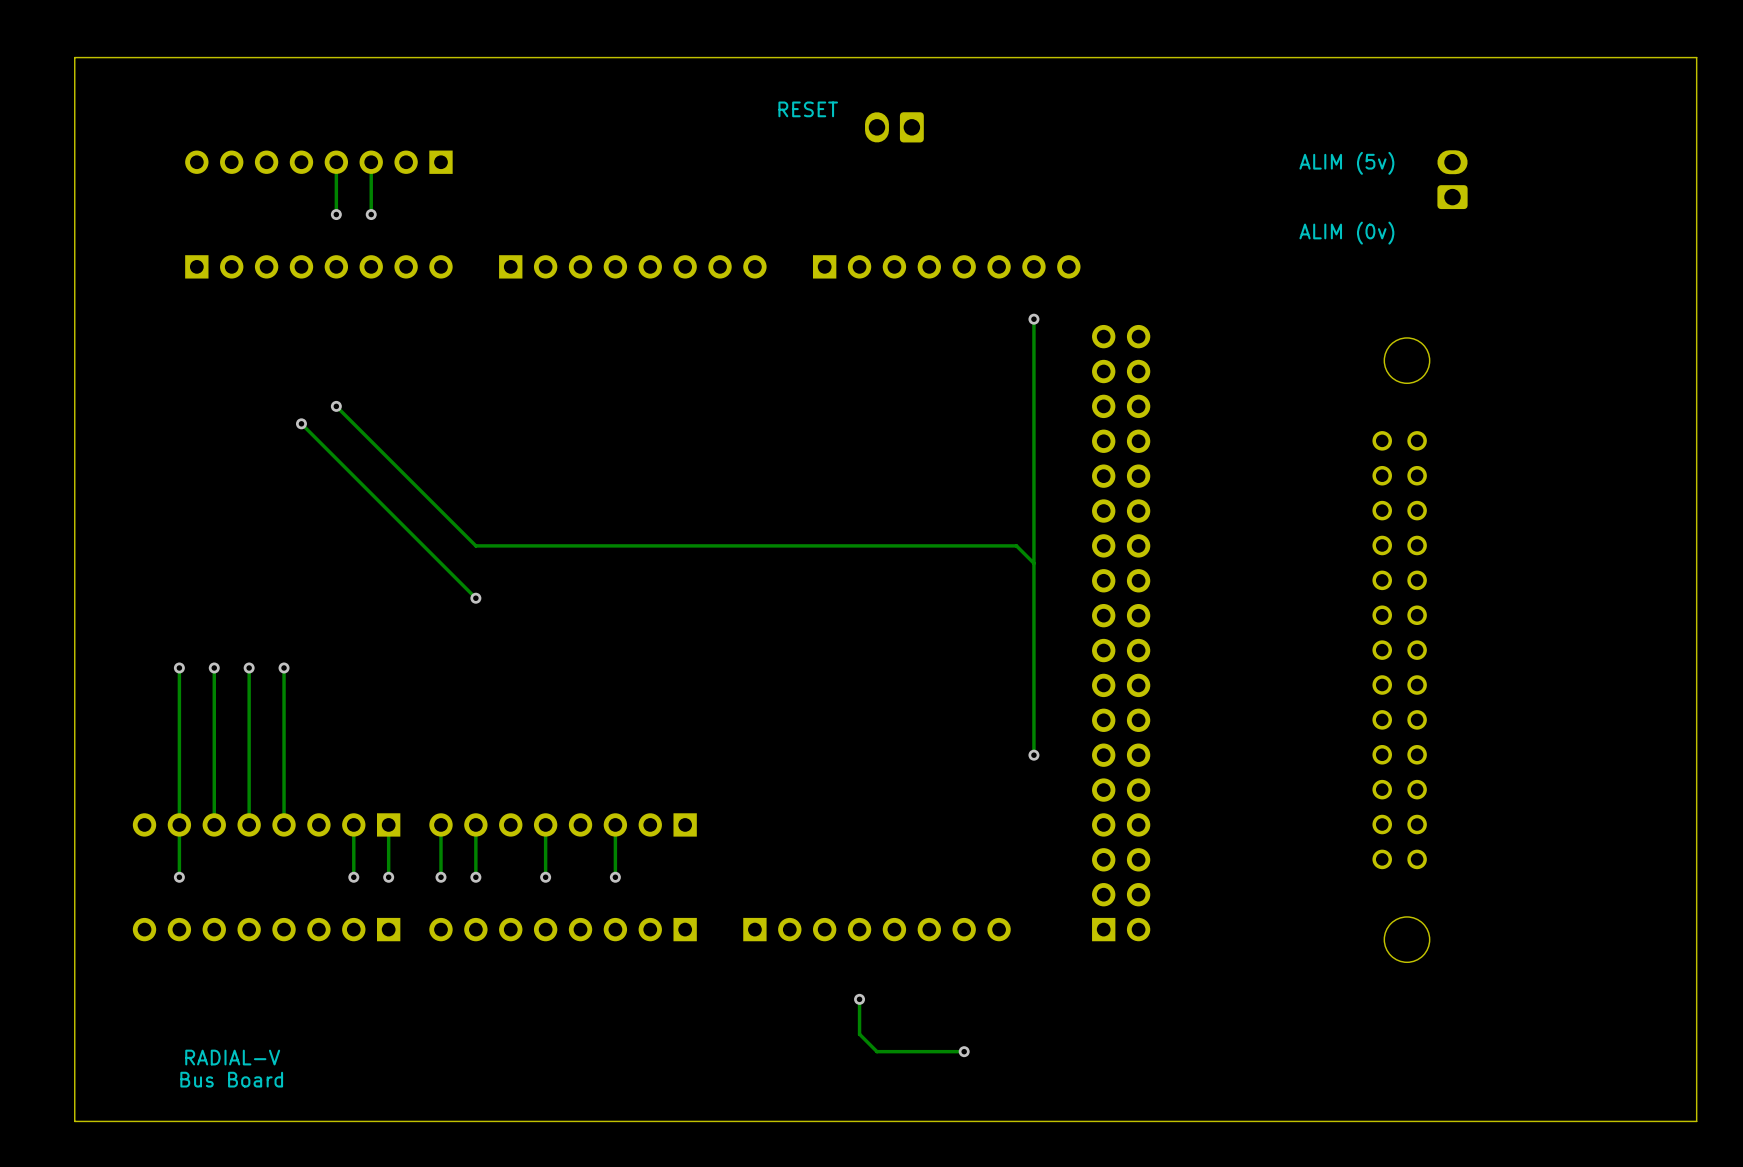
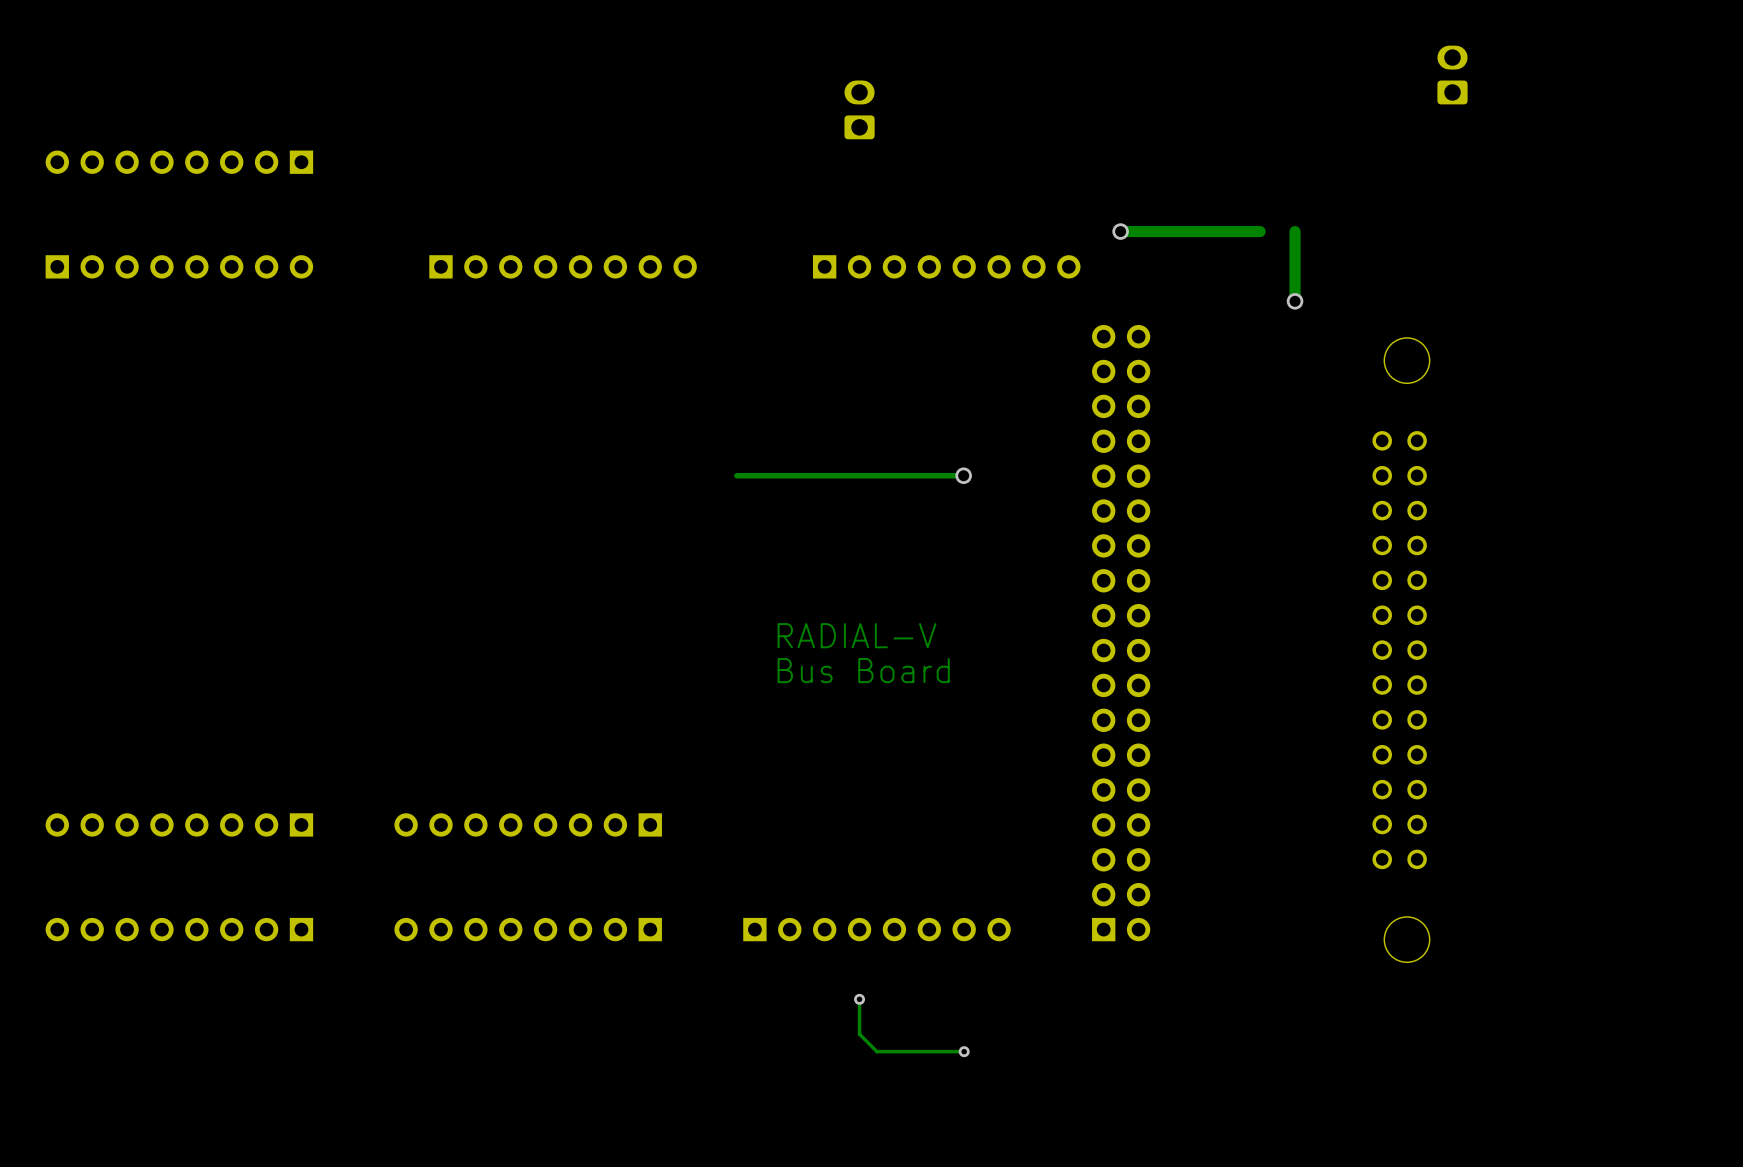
board edge: (1696, 57) (74, 57) (74, 1121) (1696, 1121) (1696, 57) -> none
text: RESET (808, 109) -> none
part rotation: 0° (894, 127) -> 90° clockwise (859, 109)
part position: (894, 127) -> (859, 109)
part: none -> (179, 162)
part: (318, 162) -> none
track: (336, 162) (336, 214) -> none
track: (371, 162) (371, 214) -> none
text: ALIM (5v) (1346, 163) -> none
part position: (1452, 179) -> (1452, 75)
via: (336, 214) -> none
via: (371, 214) -> none
via: none -> (1120, 231)
track: none -> (1260, 231) (1120, 231)
track: none -> (1295, 231) (1295, 301)
text: ALIM (0v) (1346, 233) -> none
part: none -> (179, 266)
part: (318, 266) -> none
part position: (632, 266) -> (563, 266)
via: none -> (1295, 301)
track: (1033, 319) (1033, 755) -> none
via: (1033, 319) -> none
track: (336, 406) (475, 545) (1016, 545) (1033, 563) -> none
via: (336, 406) -> none
track: (301, 423) (475, 598) -> none
via: (301, 423) -> none
track: none -> (963, 475) (736, 475)
via: none -> (963, 475)
via: (475, 598) -> none
text: none -> RADIAL-V (857, 635)
track: (179, 667) (179, 877) -> none
via: (179, 667) -> none
track: (214, 667) (214, 824) -> none
via: (214, 667) -> none
track: (249, 667) (249, 824) -> none
via: (249, 667) -> none
track: (284, 667) (284, 824) -> none
via: (284, 667) -> none
text: none -> Bus Board (863, 670)
via: (1033, 755) -> none
part: none -> (179, 824)
part: (266, 824) -> none
track: (353, 824) (353, 877) -> none
track: (388, 824) (388, 877) -> none
track: (440, 824) (440, 877) -> none
track: (475, 824) (475, 877) -> none
track: (545, 824) (545, 877) -> none
part position: (563, 824) -> (528, 824)
track: (615, 824) (615, 877) -> none
via: (179, 877) -> none
via: (353, 877) -> none
via: (388, 877) -> none
via: (440, 877) -> none
via: (475, 877) -> none
via: (545, 877) -> none
via: (615, 877) -> none
part: none -> (179, 929)
part: (266, 929) -> none
part position: (563, 929) -> (528, 929)
text: RADIAL-V (232, 1057) -> none
text: Bus Board (231, 1079) -> none

